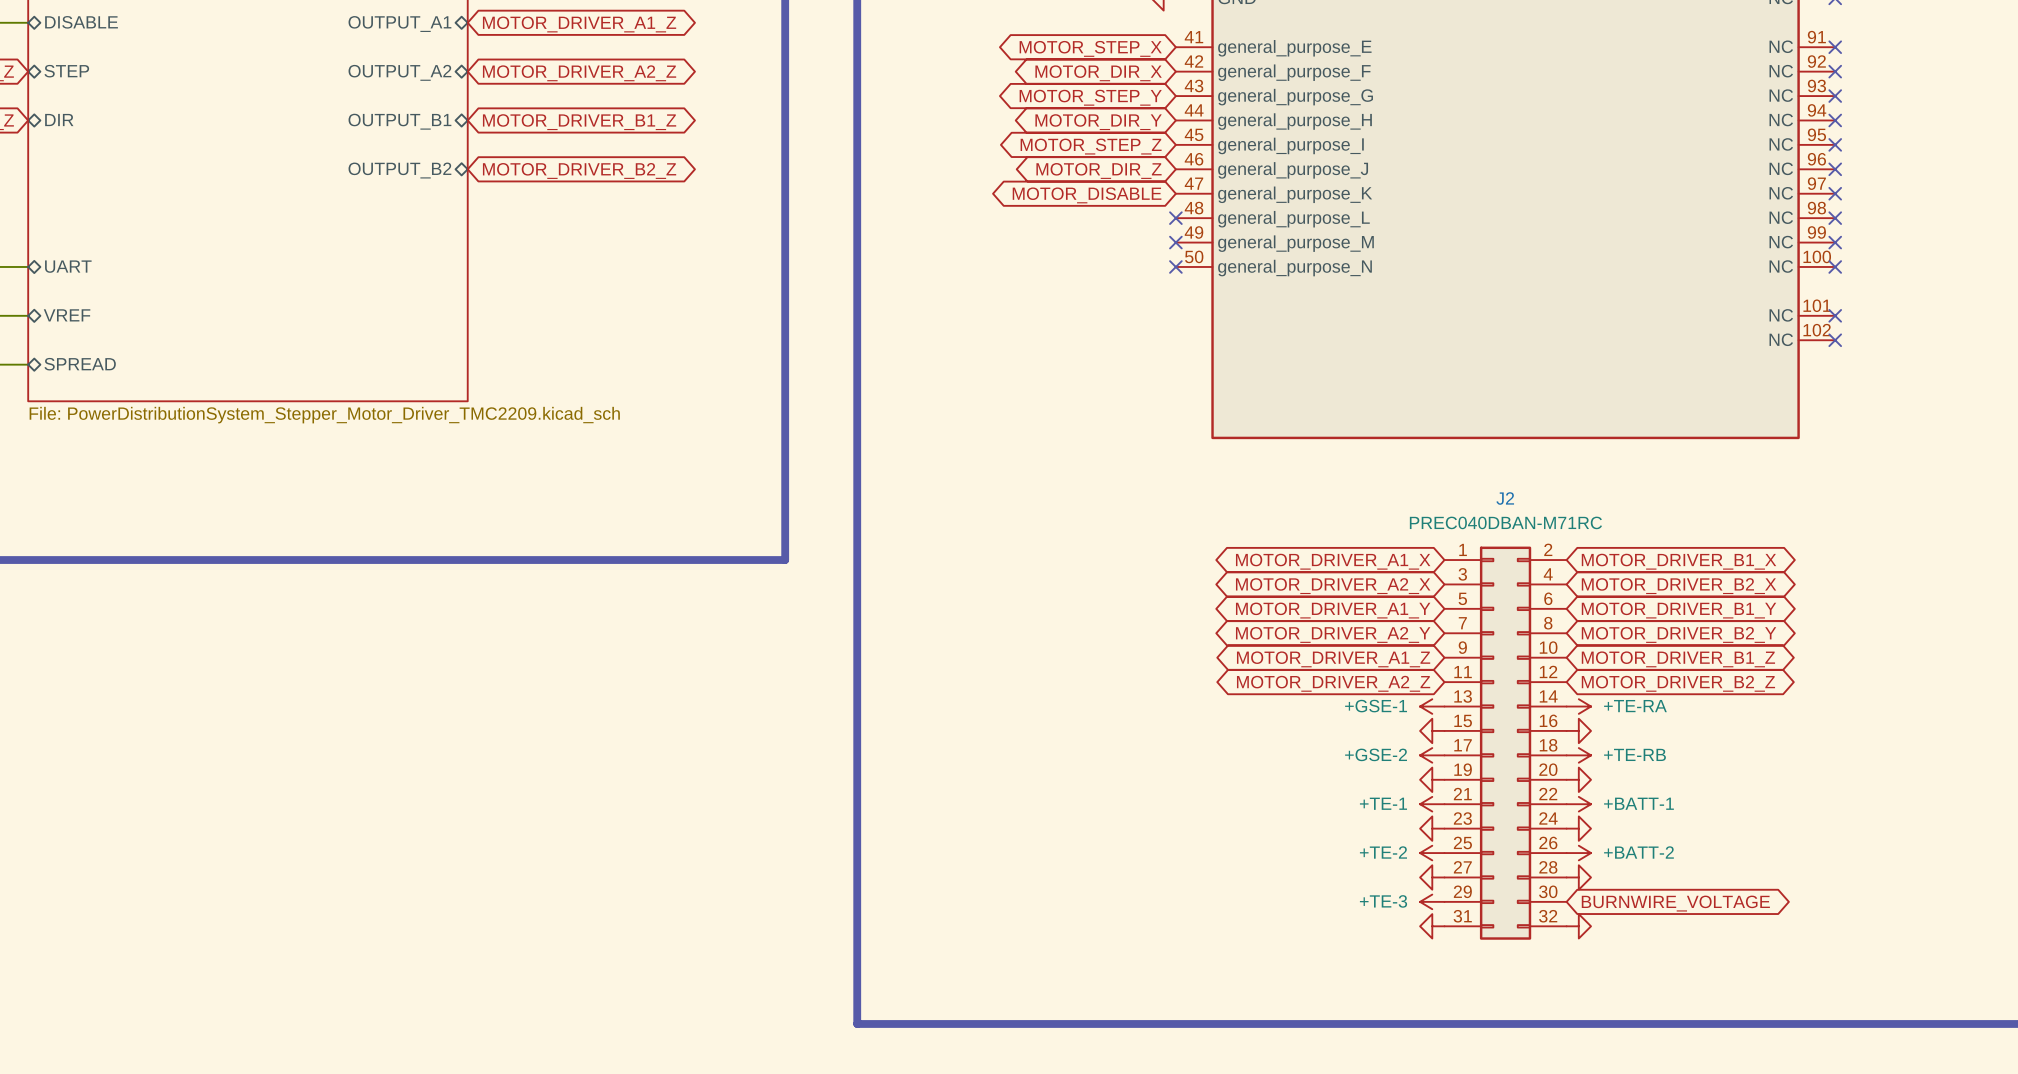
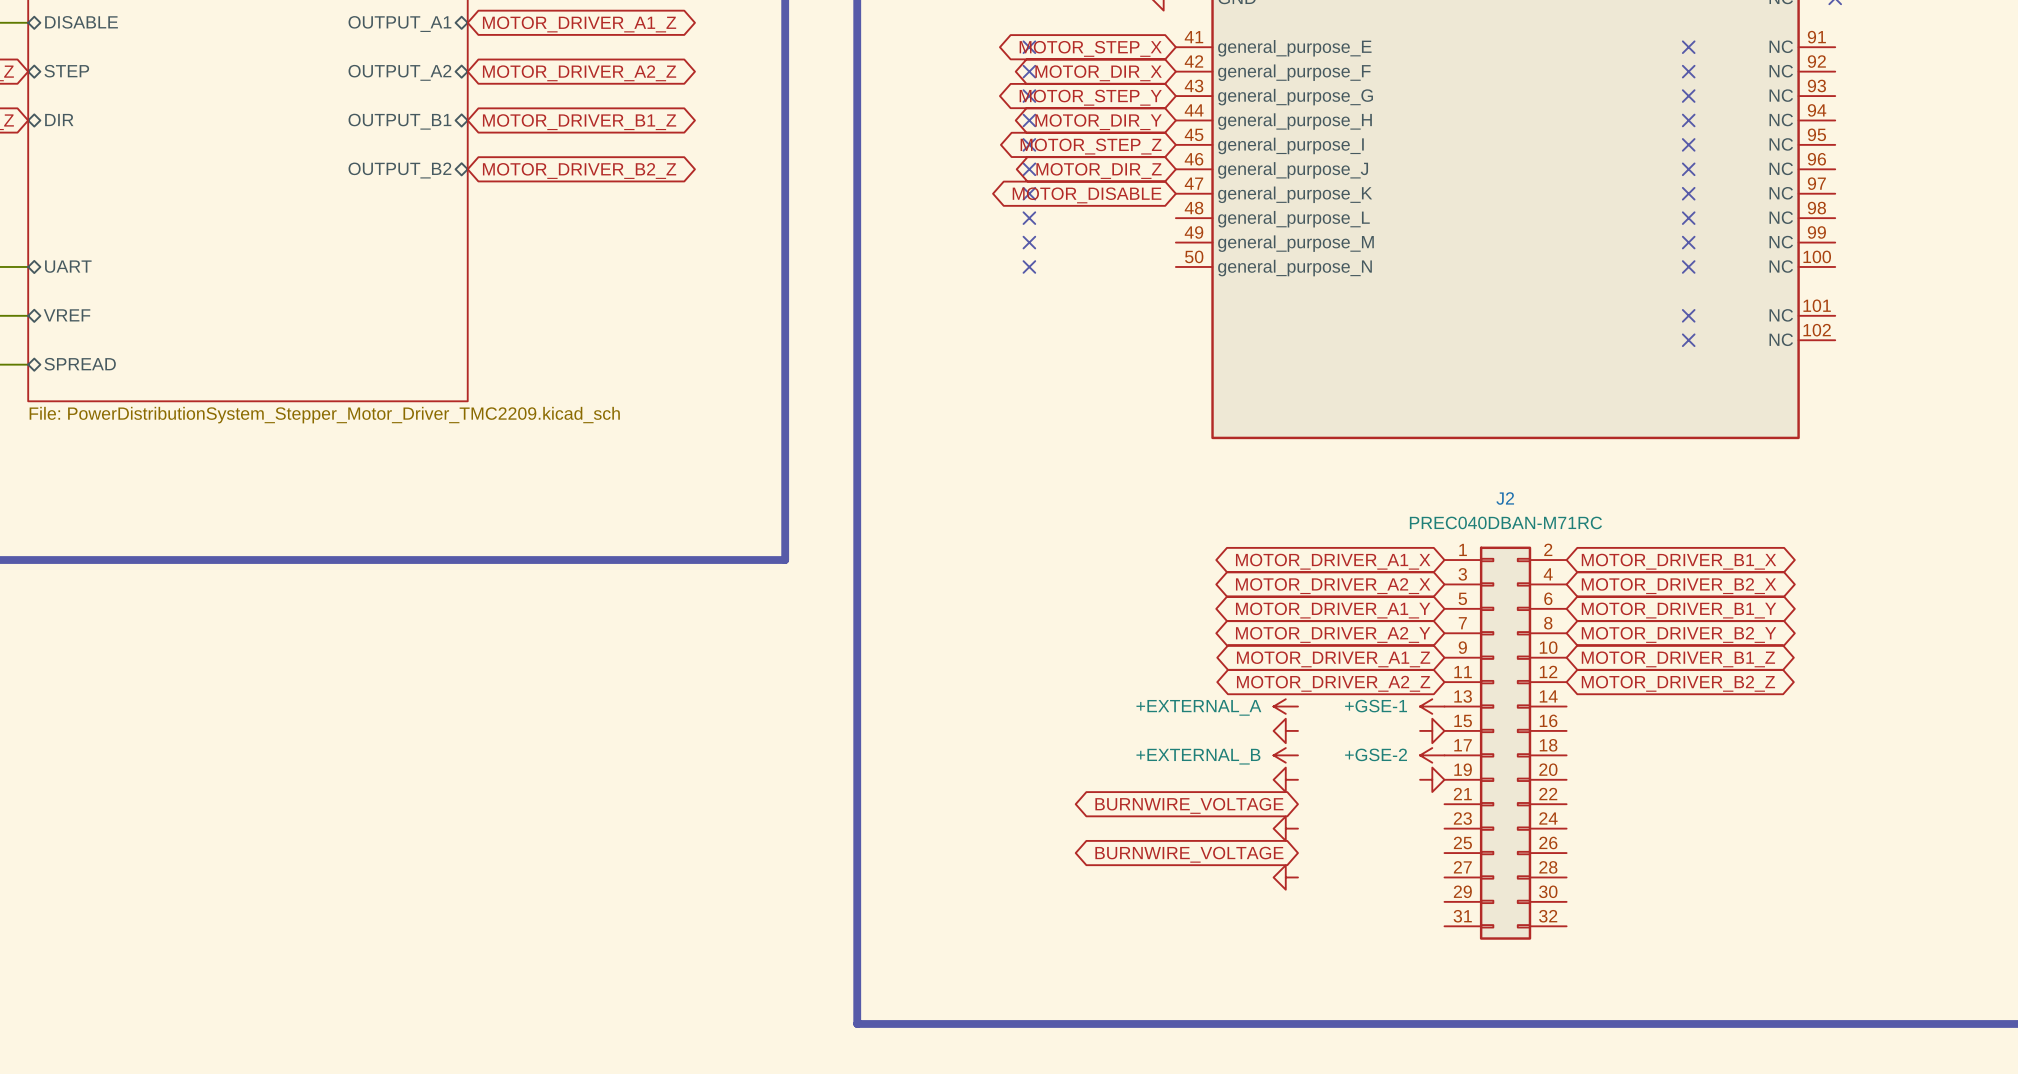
no-connect mark: none -> (1029, 47)
no-connect mark: none -> (1688, 47)
no-connect mark: (1835, 47) -> none
no-connect mark: none -> (1029, 71)
no-connect mark: none -> (1688, 71)
no-connect mark: (1835, 71) -> none
no-connect mark: none -> (1029, 96)
no-connect mark: none -> (1688, 96)
no-connect mark: (1835, 96) -> none
no-connect mark: none -> (1029, 120)
no-connect mark: none -> (1688, 120)
no-connect mark: (1835, 120) -> none
no-connect mark: none -> (1029, 144)
no-connect mark: none -> (1688, 144)
no-connect mark: (1835, 144) -> none
no-connect mark: none -> (1029, 169)
no-connect mark: none -> (1688, 169)
no-connect mark: (1835, 169) -> none
no-connect mark: none -> (1029, 193)
no-connect mark: none -> (1688, 193)
no-connect mark: (1835, 193) -> none
no-connect mark: none -> (1029, 218)
no-connect mark: (1175, 218) -> none
no-connect mark: none -> (1688, 218)
no-connect mark: (1835, 218) -> none
no-connect mark: none -> (1029, 242)
no-connect mark: (1175, 242) -> none
no-connect mark: none -> (1688, 242)
no-connect mark: (1835, 242) -> none
no-connect mark: none -> (1029, 266)
no-connect mark: (1175, 266) -> none
no-connect mark: none -> (1688, 266)
no-connect mark: (1835, 266) -> none
no-connect mark: none -> (1688, 315)
no-connect mark: (1835, 315) -> none
no-connect mark: none -> (1688, 340)
no-connect mark: (1835, 340) -> none
power symbol: none -> +EXTERNAL_A (1285, 706)
power symbol: +TE-RA (1578, 706) -> none
power symbol: none -> (1285, 730)
power symbol rotation: 0° (1432, 730) -> 180° (1432, 730)
power symbol: (1578, 730) -> none
power symbol: none -> +EXTERNAL_B (1285, 755)
power symbol: +TE-RB (1578, 755) -> none
power symbol: none -> (1285, 779)
power symbol rotation: 0° (1432, 779) -> 180° (1432, 779)
power symbol: (1578, 779) -> none
power symbol: +TE-1 (1432, 804) -> none
power symbol: +BATT-1 (1578, 804) -> none
global label: none -> BURNWIRE_VOLTAGE (1189, 805)
power symbol: none -> (1285, 828)
power symbol: (1432, 828) -> none
power symbol: (1578, 828) -> none
power symbol: +TE-2 (1432, 853) -> none
power symbol: +BATT-2 (1578, 853) -> none
global label: none -> BURNWIRE_VOLTAGE (1189, 854)
power symbol: none -> (1285, 877)
power symbol: (1432, 877) -> none
power symbol: (1578, 877) -> none
power symbol: +TE-3 (1432, 901) -> none
global label: BURNWIRE_VOLTAGE (1675, 903) -> none
power symbol: (1432, 926) -> none
power symbol: (1578, 926) -> none

